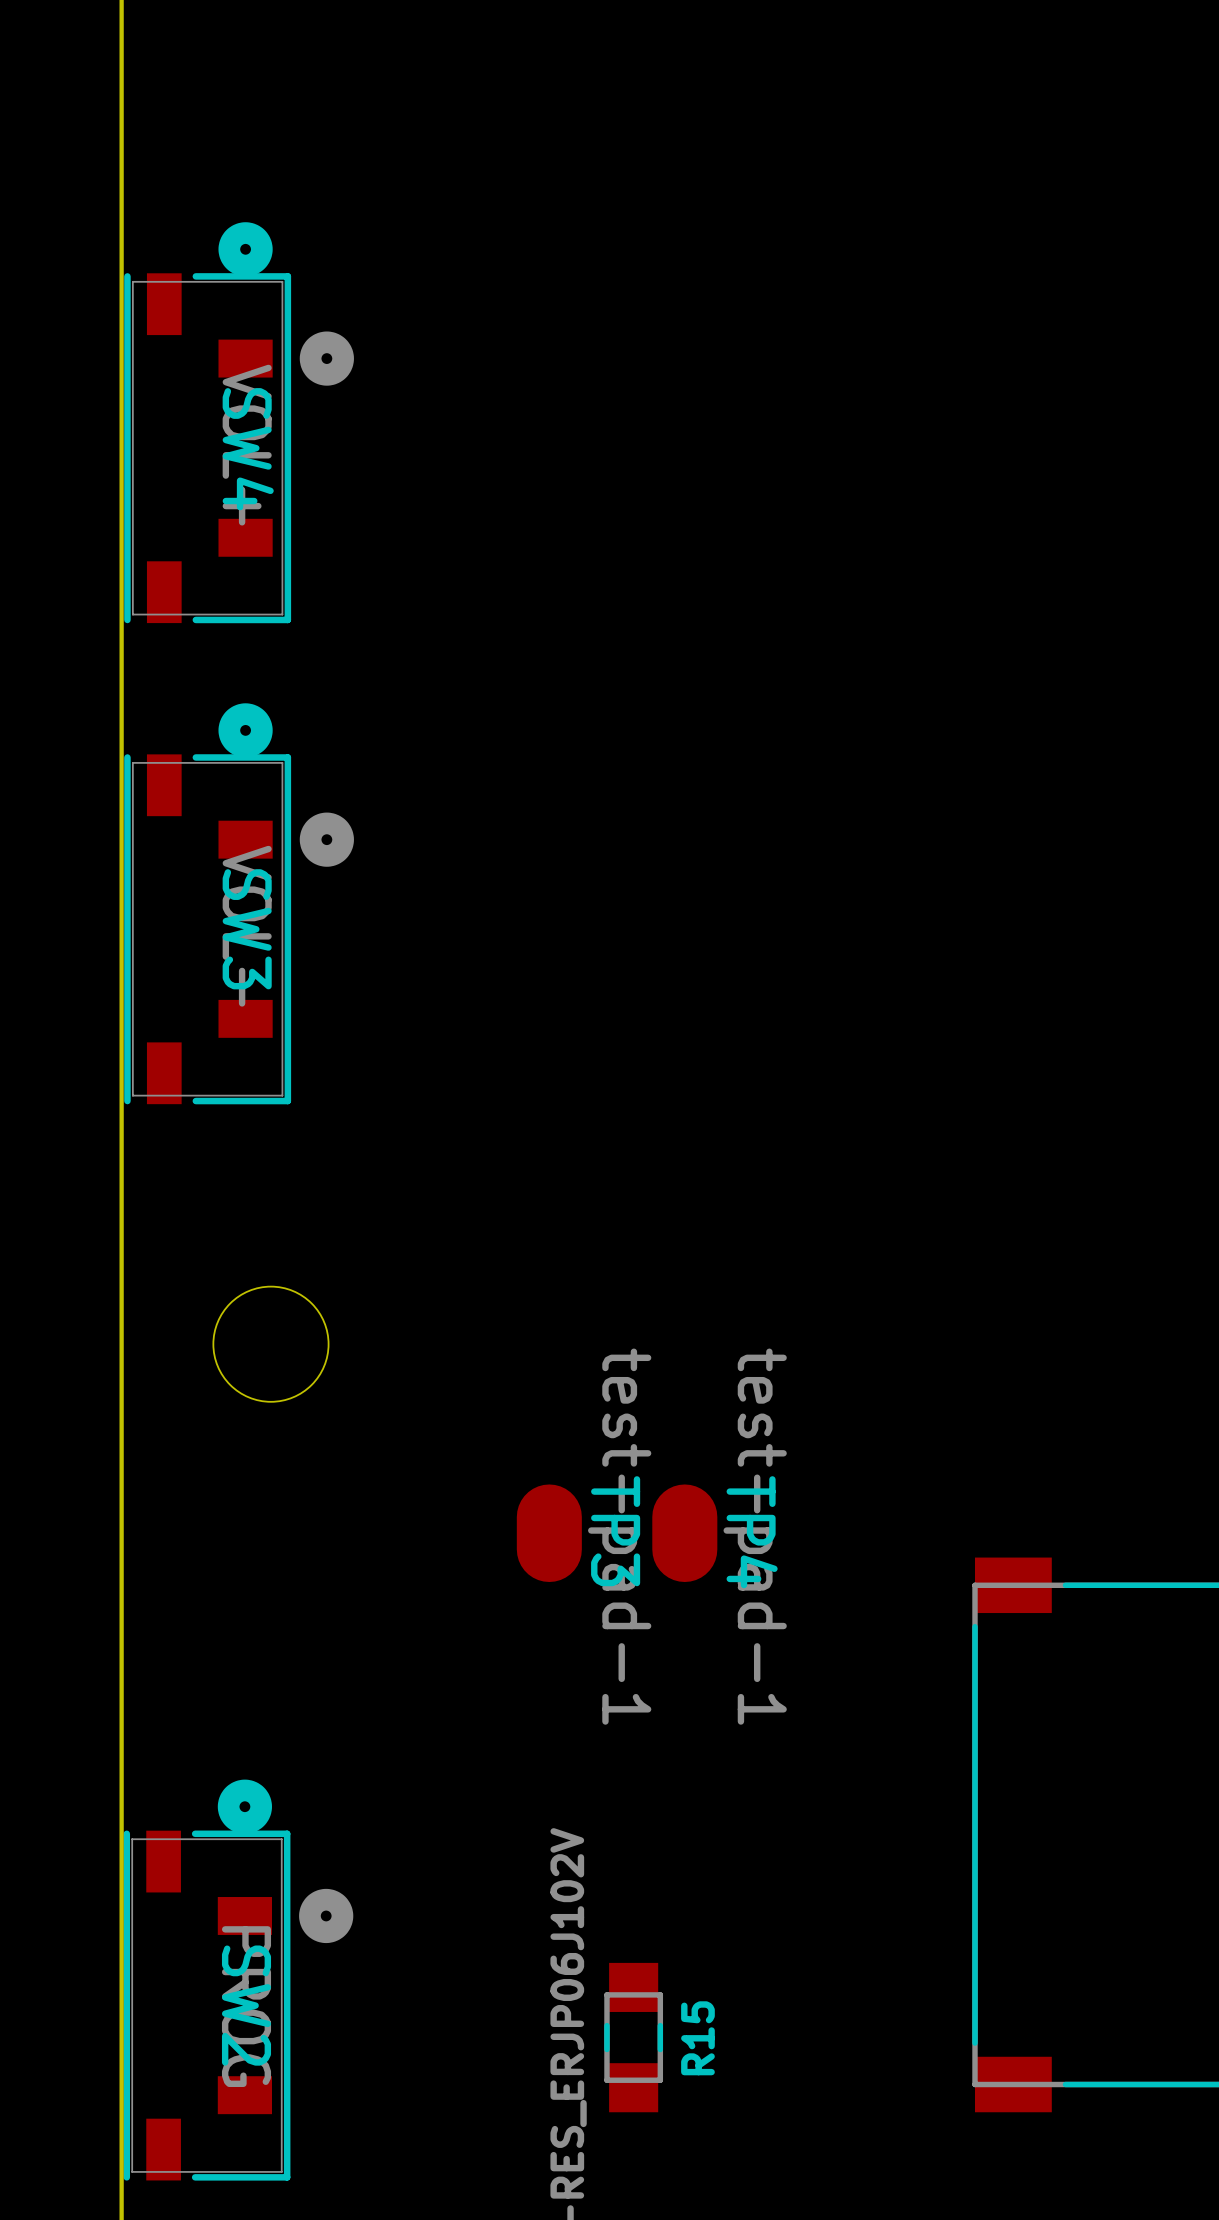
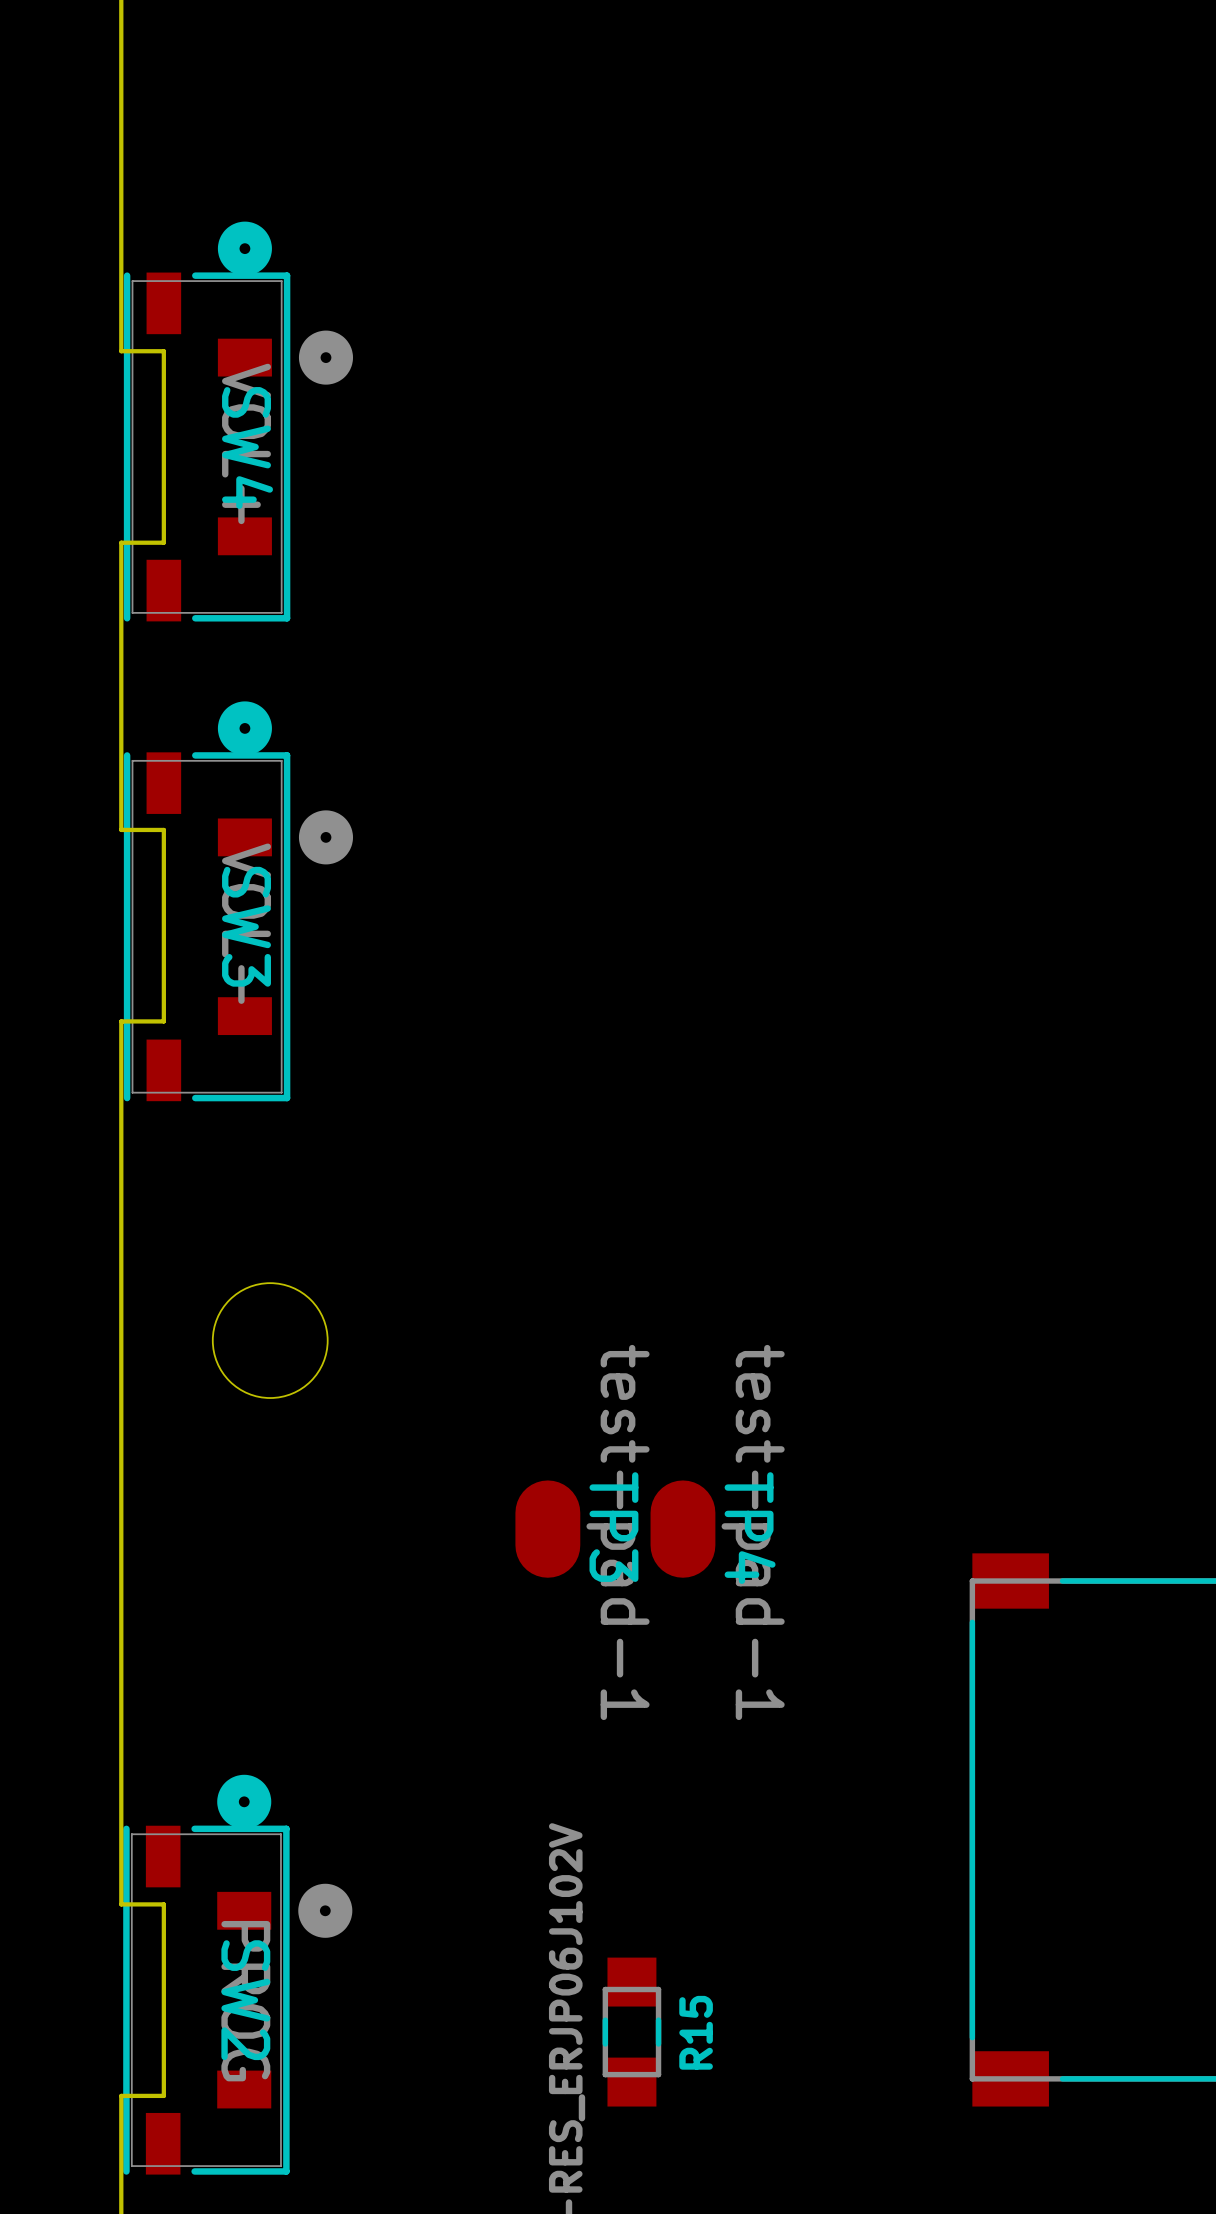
board edge: (121, 352) (121, 544) -> (121, 351) (163, 351) (163, 542) (121, 542)
board edge: (121, 832) (121, 1024) -> (121, 829) (163, 829) (163, 1021) (121, 1021)
board edge: (121, 1909) (121, 2101) -> (121, 1904) (163, 1904) (163, 2095) (121, 2095)

